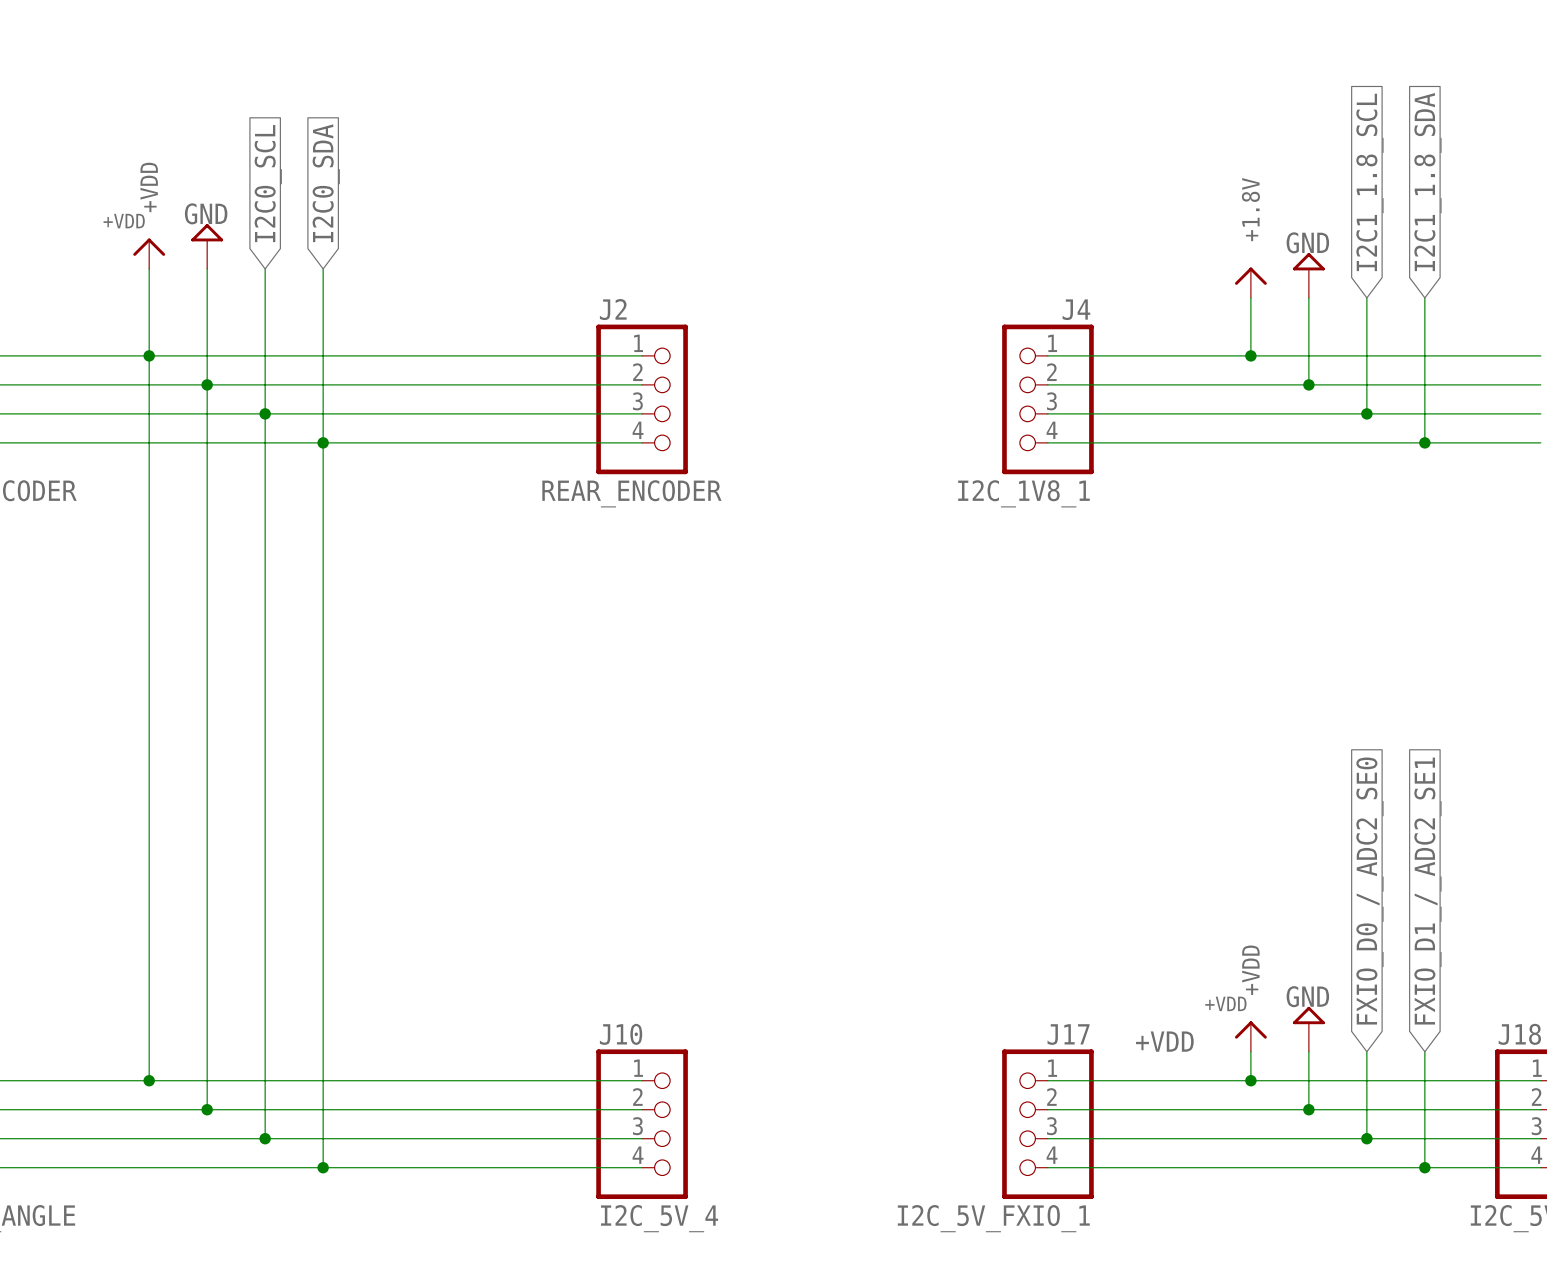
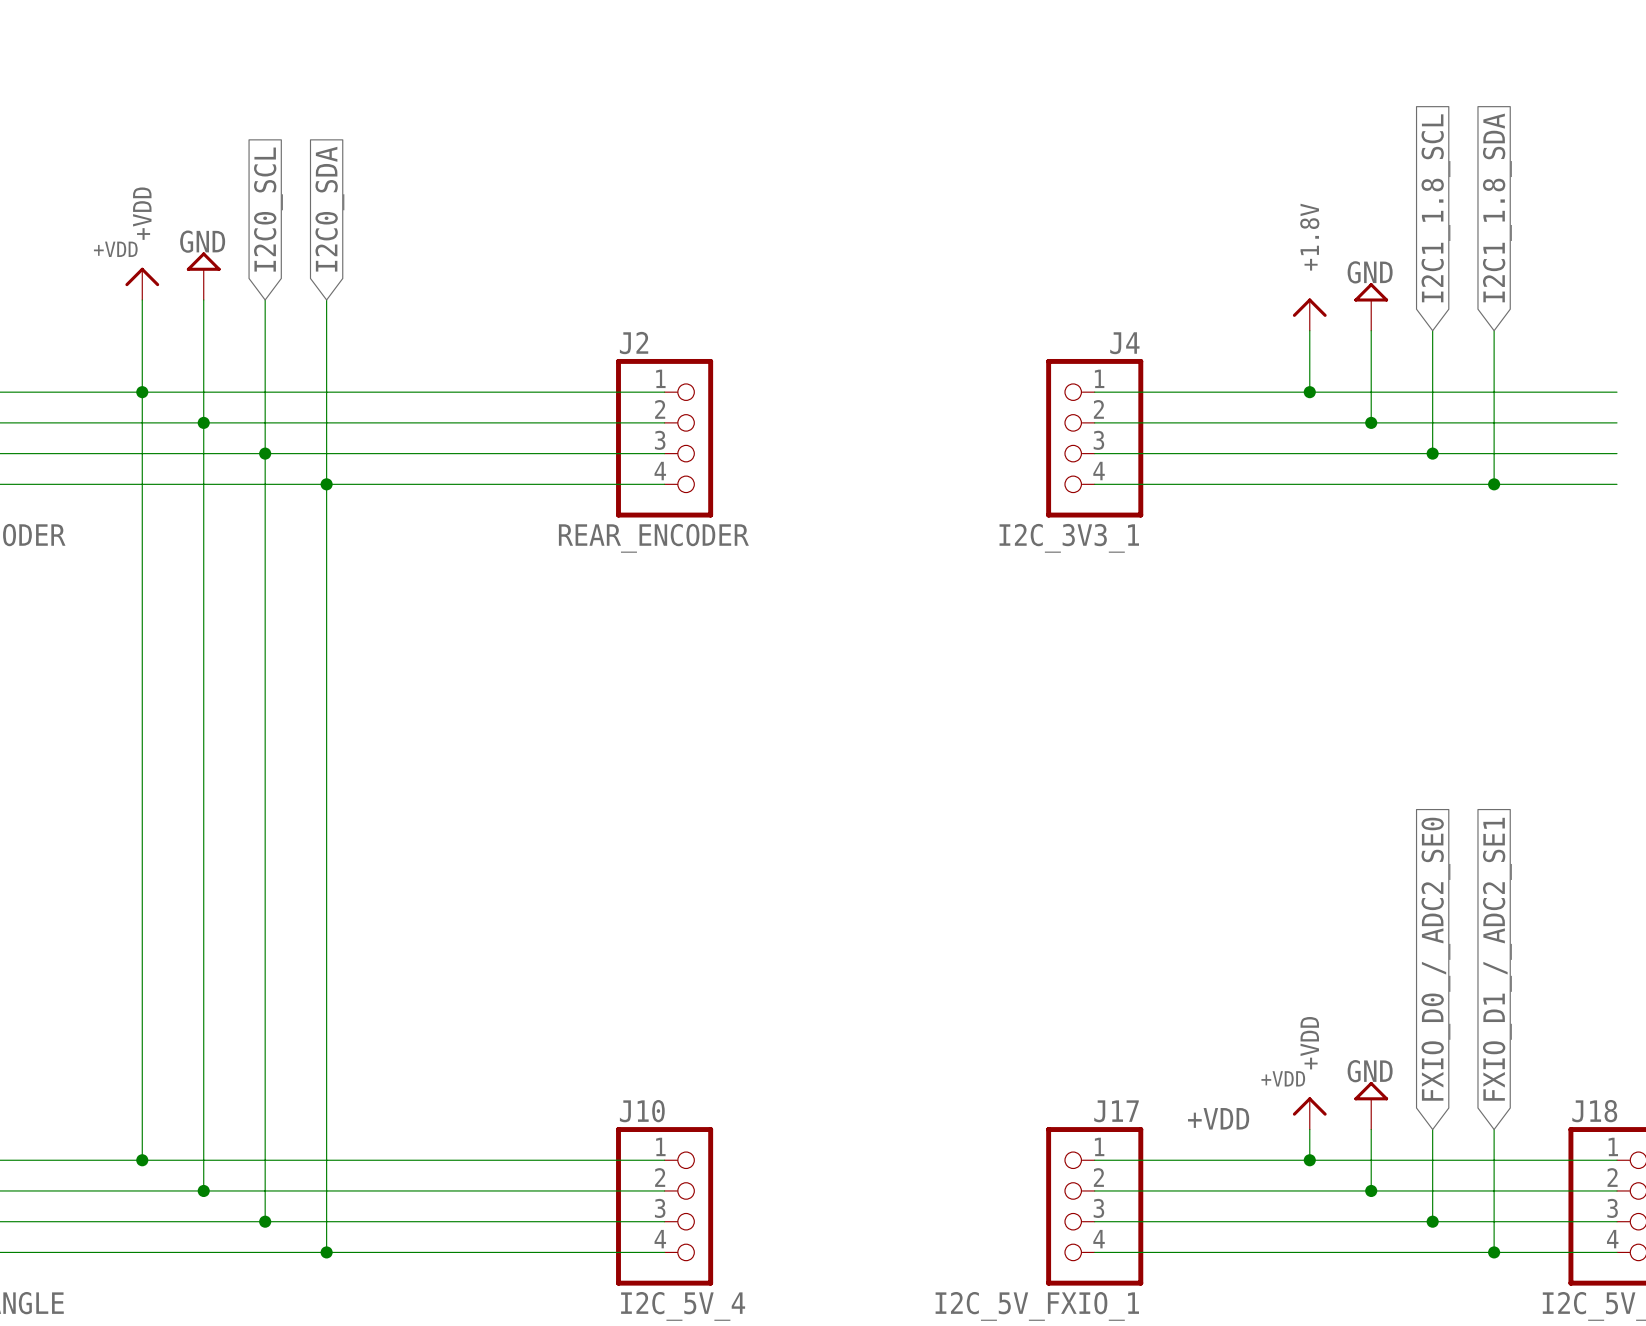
J4 value: I2C_1V8_1 (1023, 493) -> I2C_3V3_1 (1069, 538)

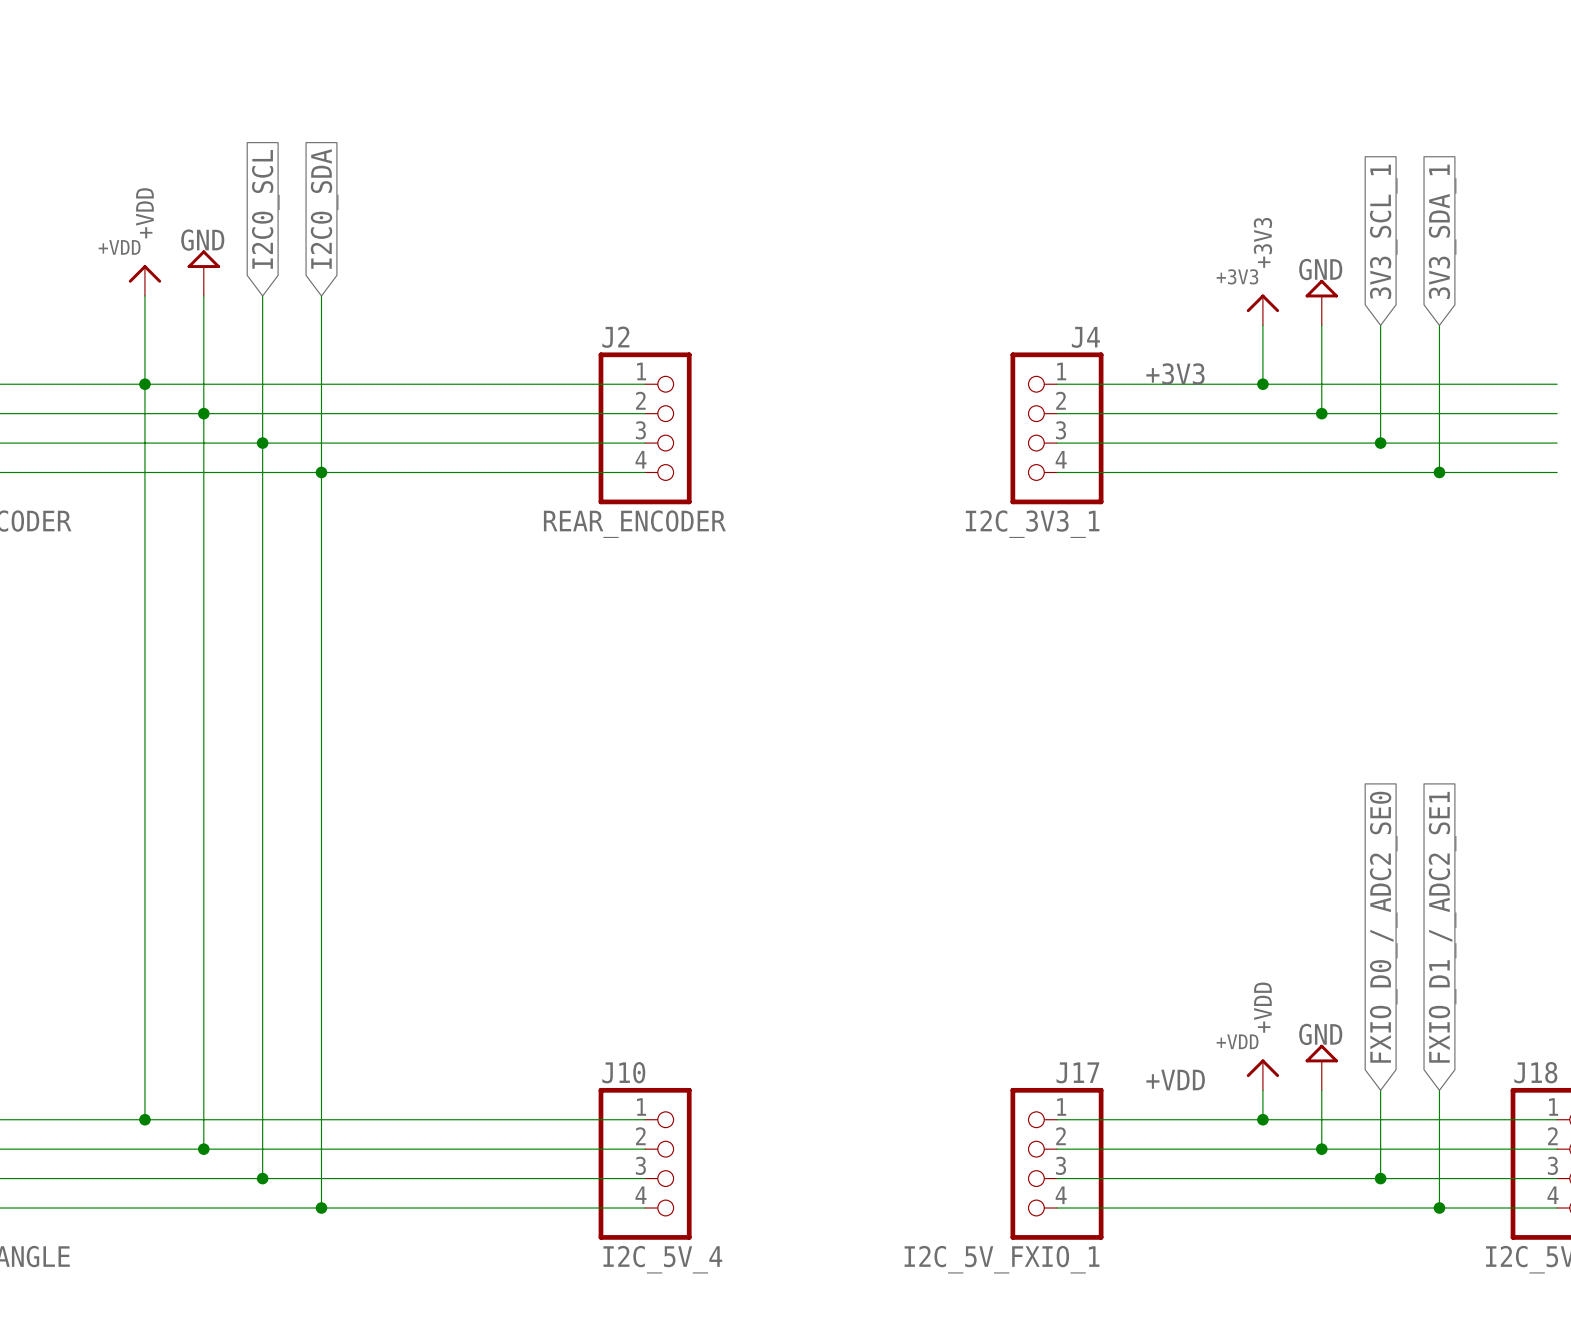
global label: I2C1_1.8_SDA (1497, 207) -> 3V3_SDA_1 (1442, 231)
global label: I2C1_1.8_SCL (1435, 208) -> 3V3_SCL_1 (1383, 231)
power symbol pin name: +1.8V (1309, 237) -> +3V3 (1262, 242)
power symbol text: none -> +3V3 (1237, 276)
label: none -> +3V3 (1175, 373)

